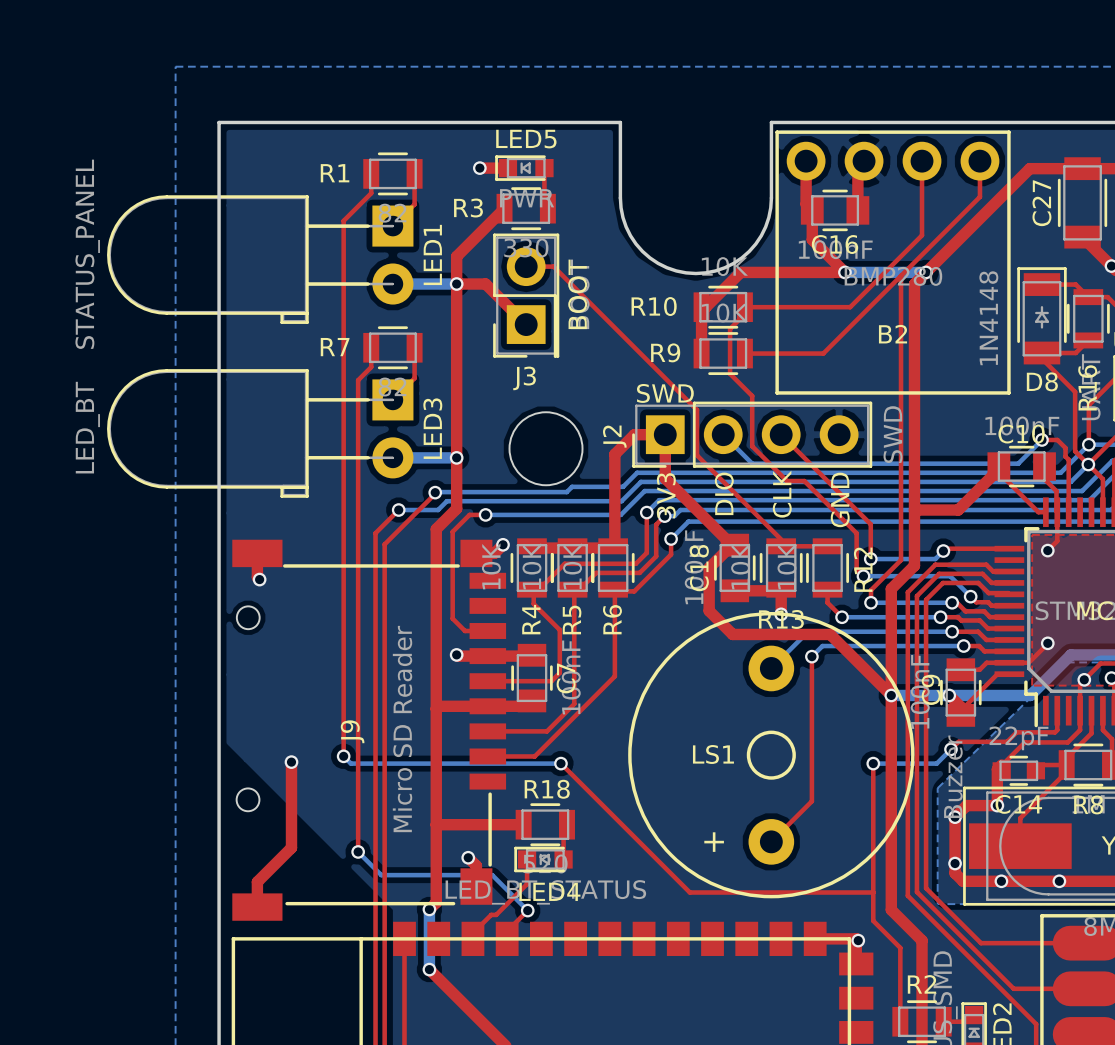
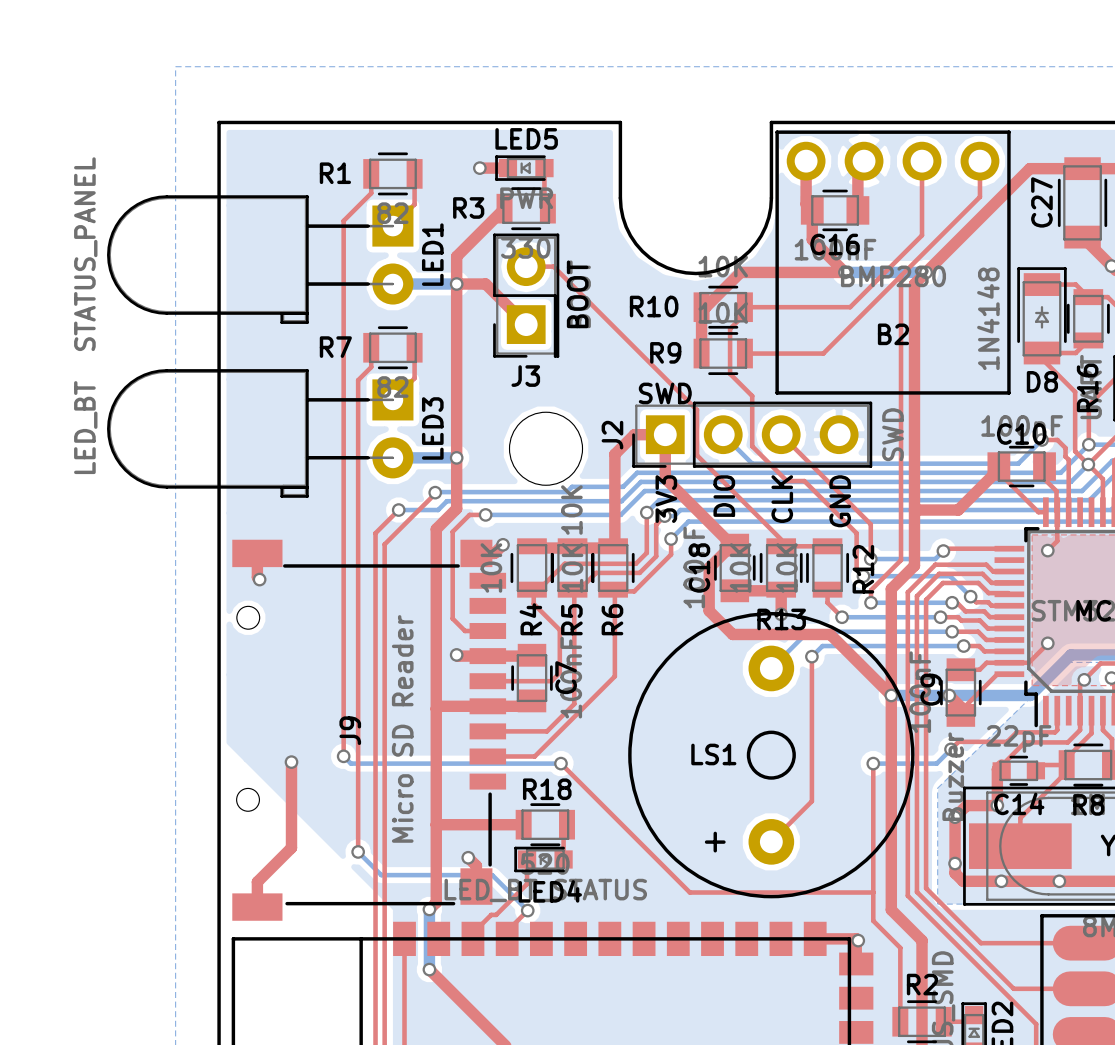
R5 value position: 10K (531, 566) -> 10K (571, 510)

